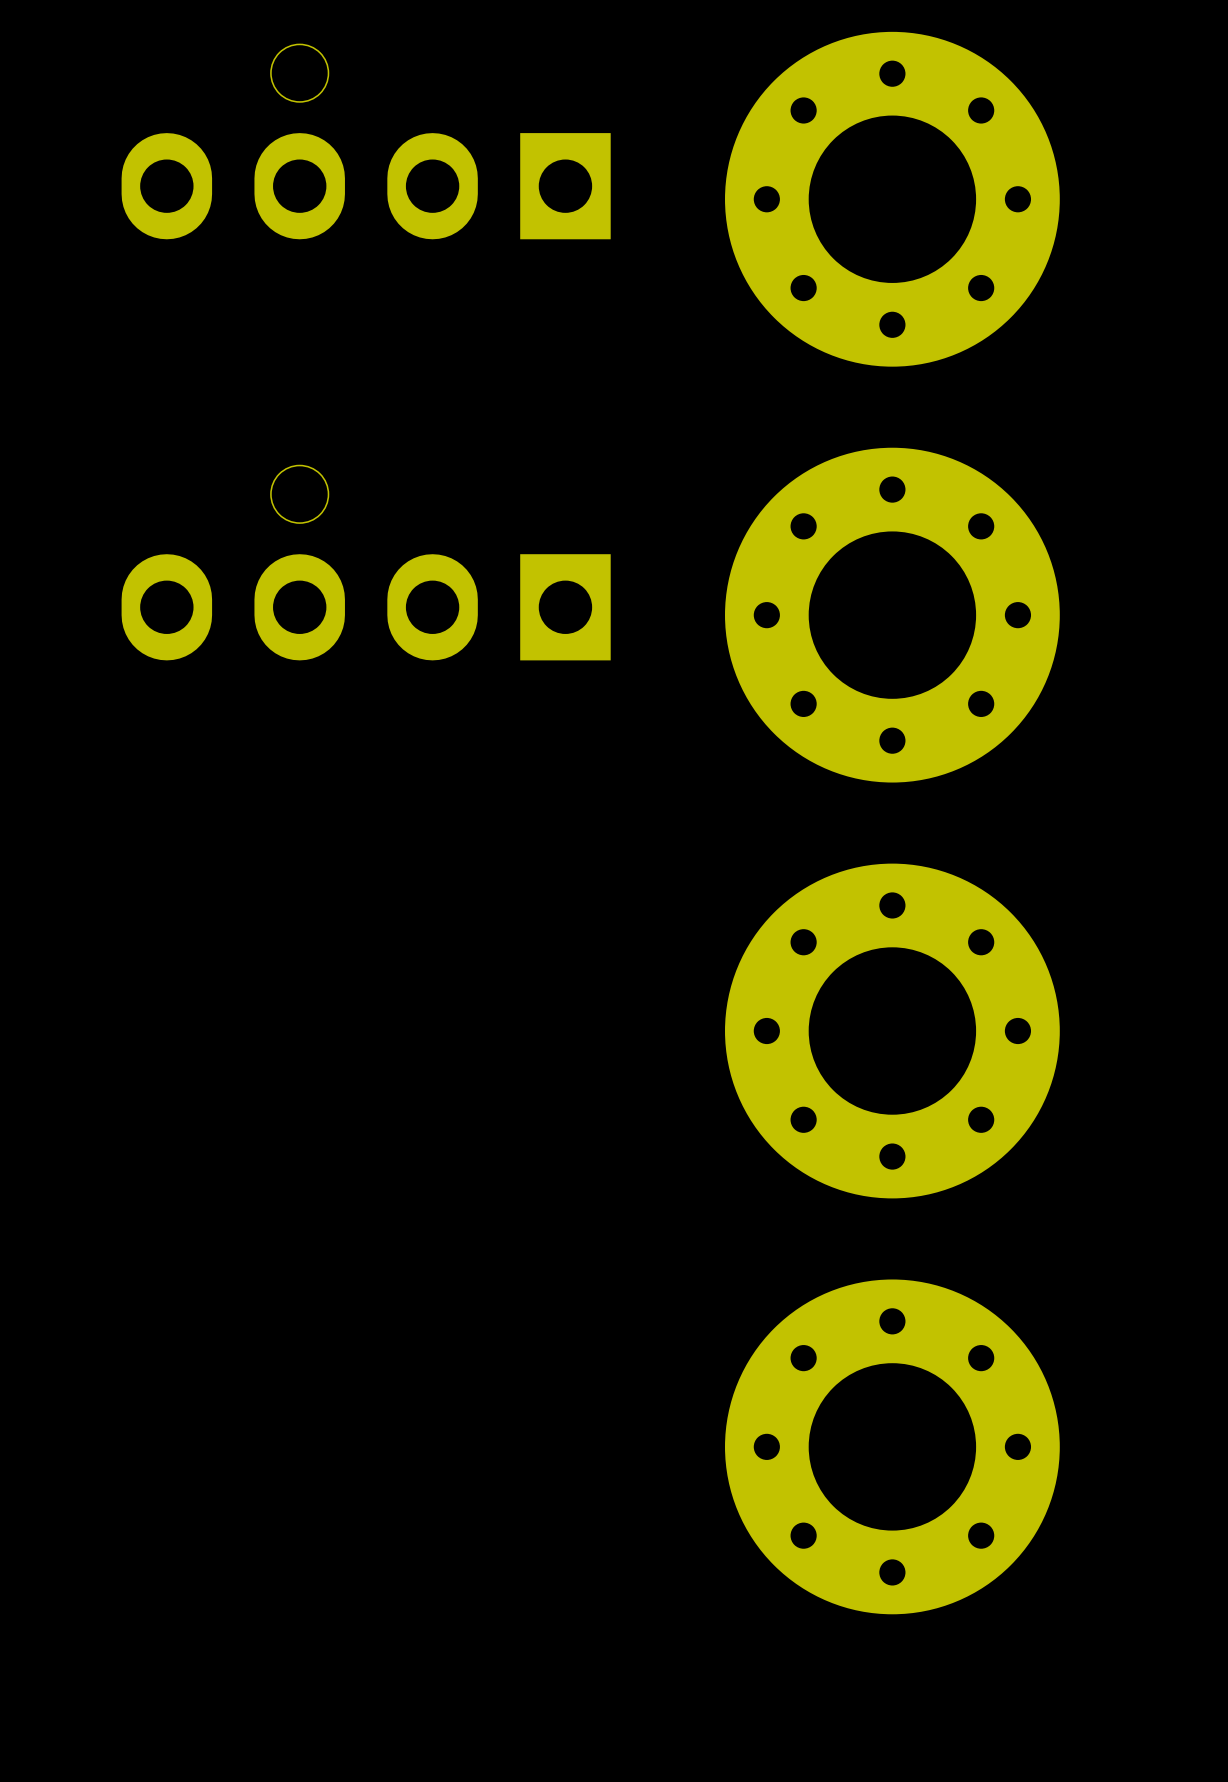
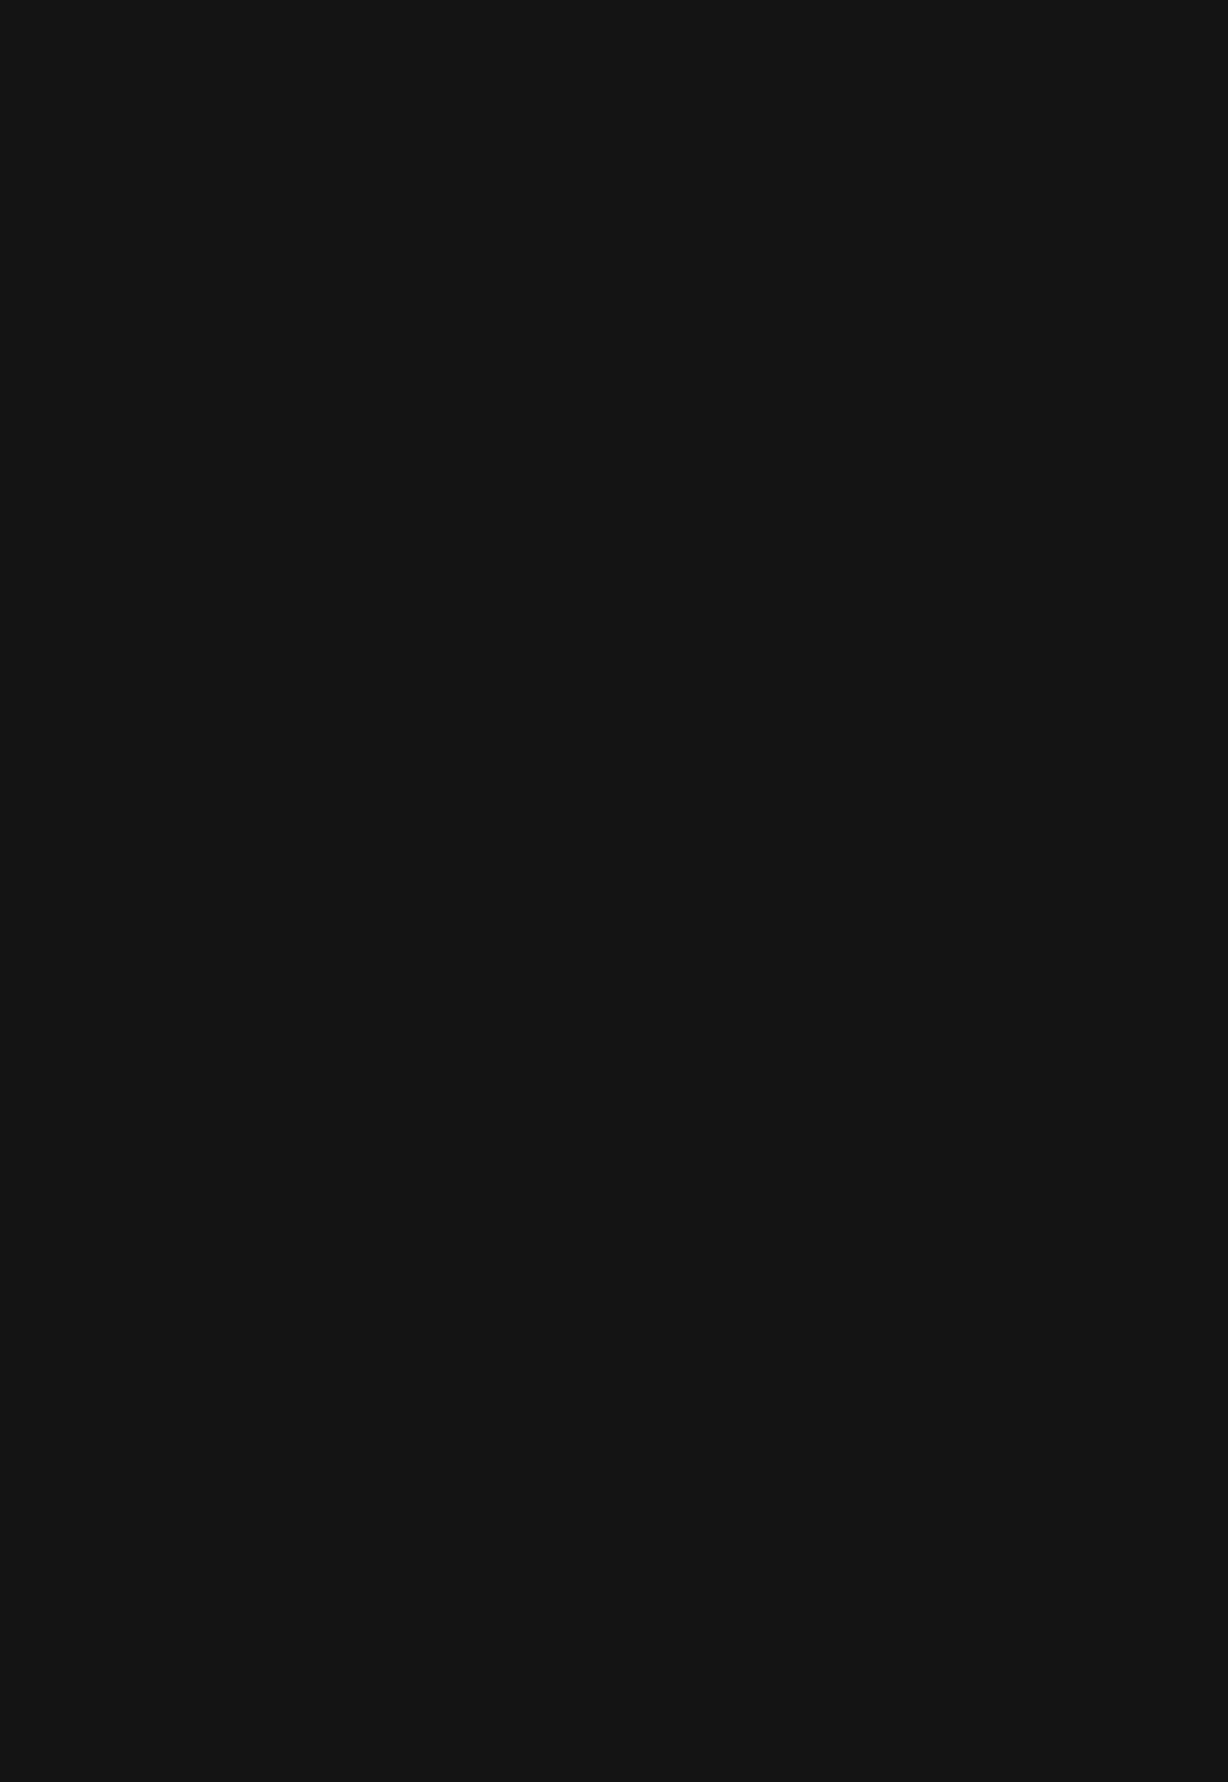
part: (366, 141) -> none
part: (892, 199) -> none
part: (366, 562) -> none
part: (892, 615) -> none
part: (892, 1031) -> none
part: (892, 1446) -> none

